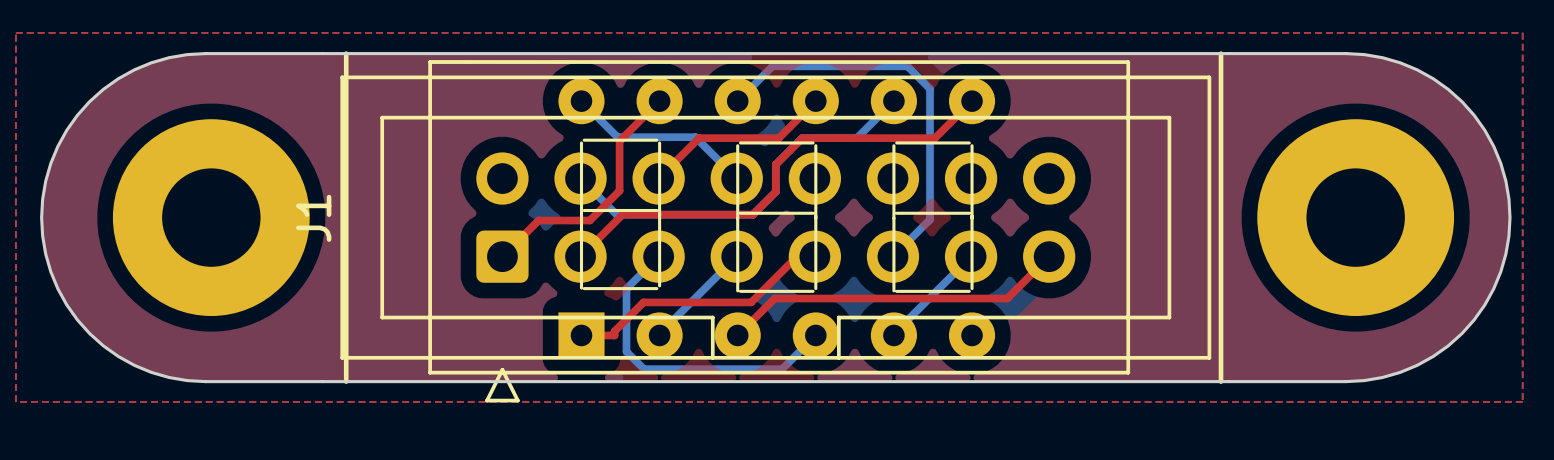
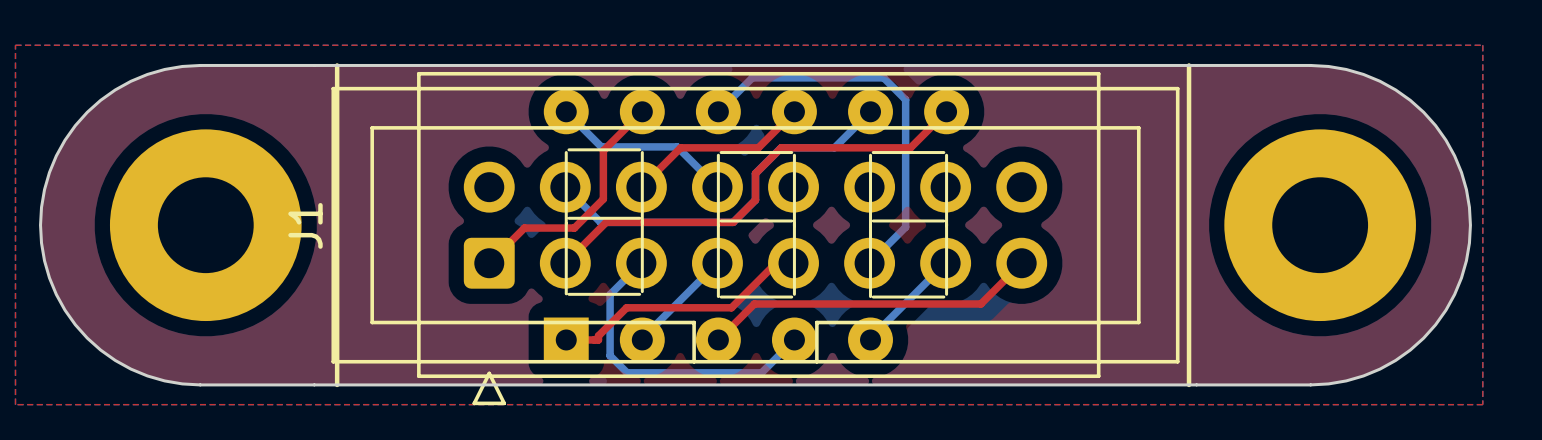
part footprint: [428, 60, 1131, 375] -> [417, 71, 1101, 379]

